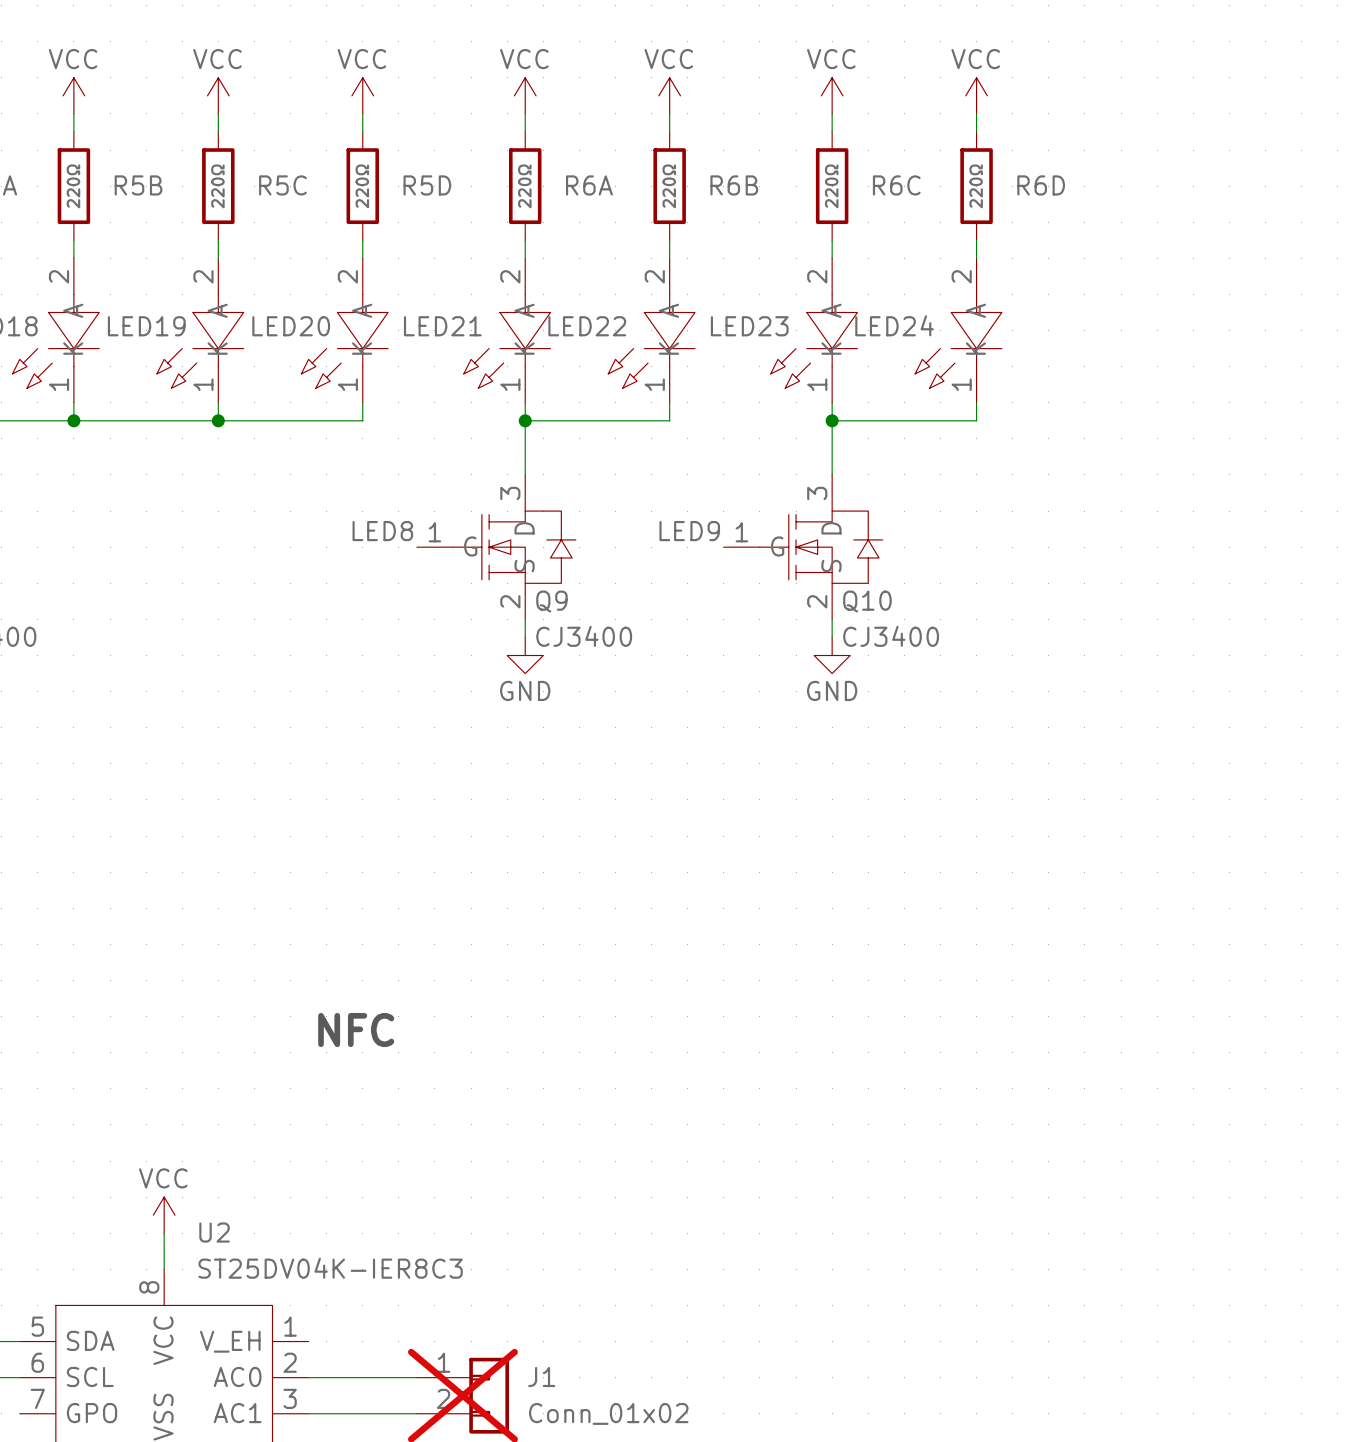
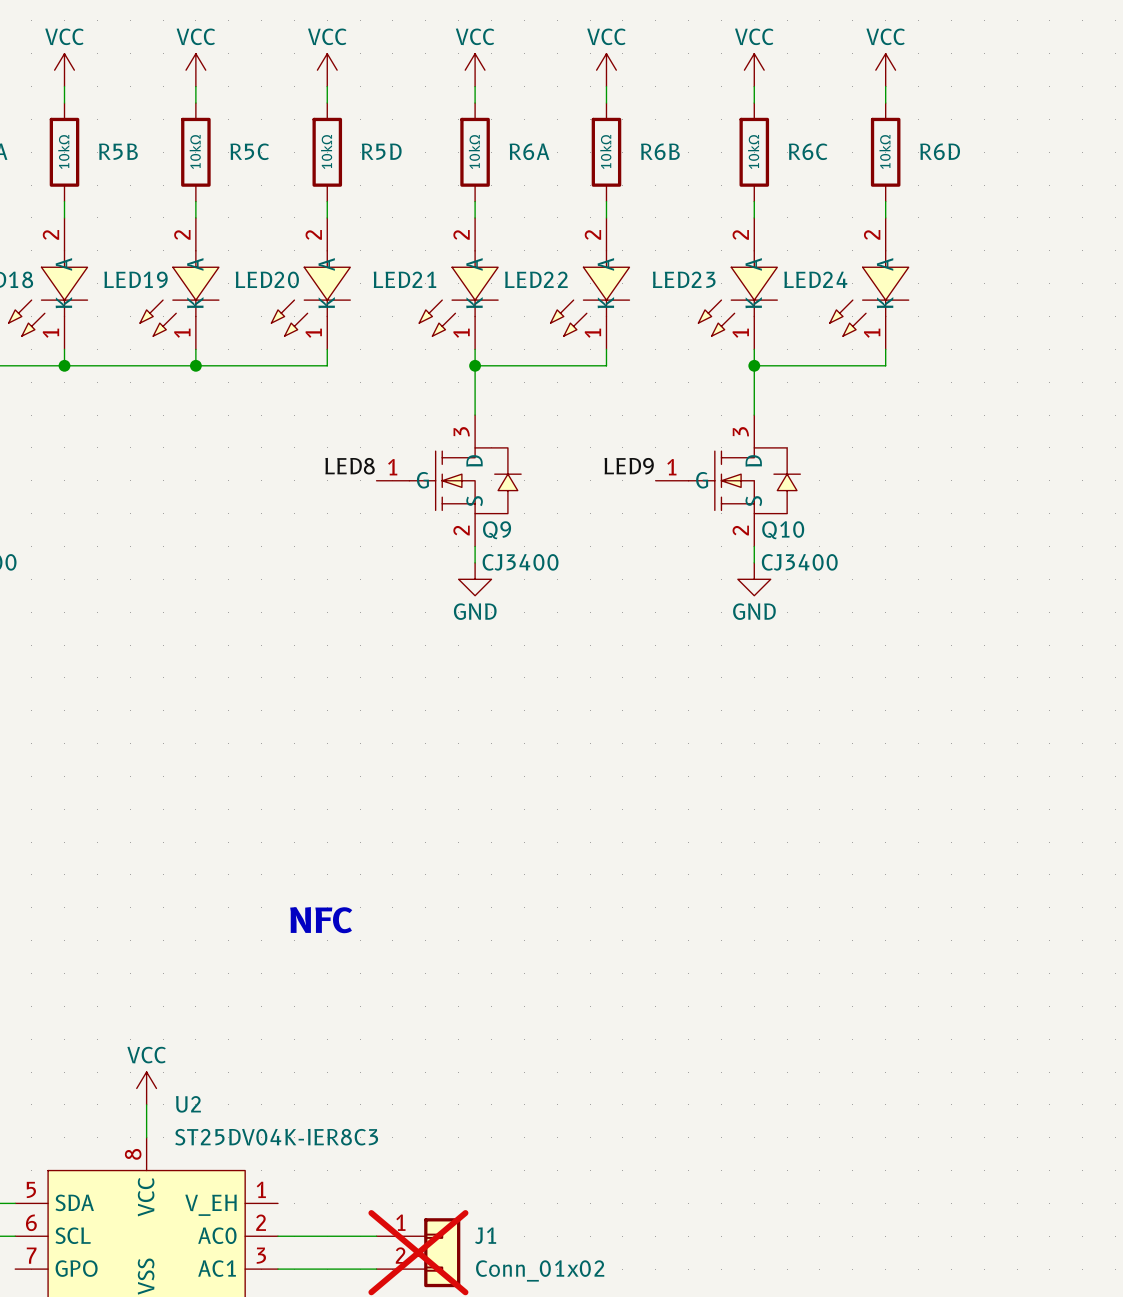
R5B value: 220Ω (73, 186) -> 10kΩ (63, 151)
R5C value: 220Ω (217, 186) -> 10kΩ (195, 151)
R5D value: 220Ω (362, 186) -> 10kΩ (326, 151)
R6A value: 220Ω (524, 186) -> 10kΩ (474, 151)
R6B value: 220Ω (669, 186) -> 10kΩ (605, 151)
R6C value: 220Ω (831, 186) -> 10kΩ (753, 151)
R6D value: 220Ω (976, 186) -> 10kΩ (885, 151)

